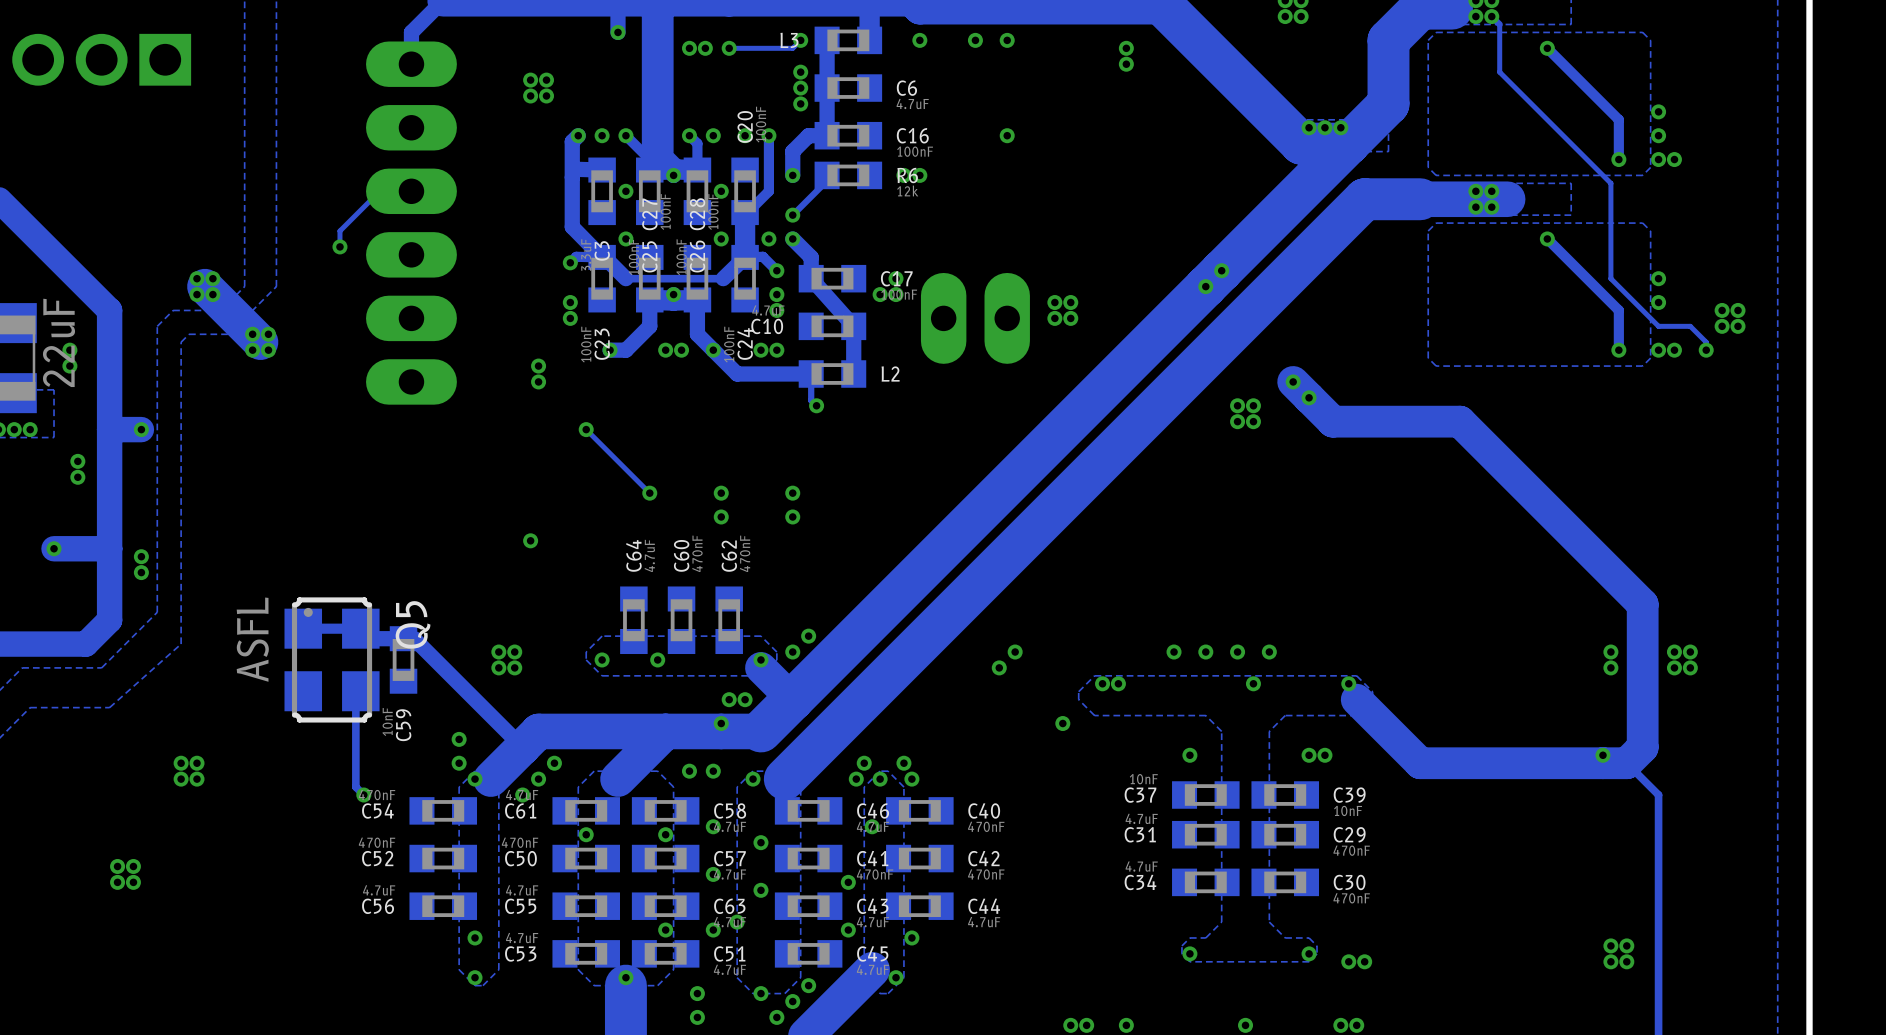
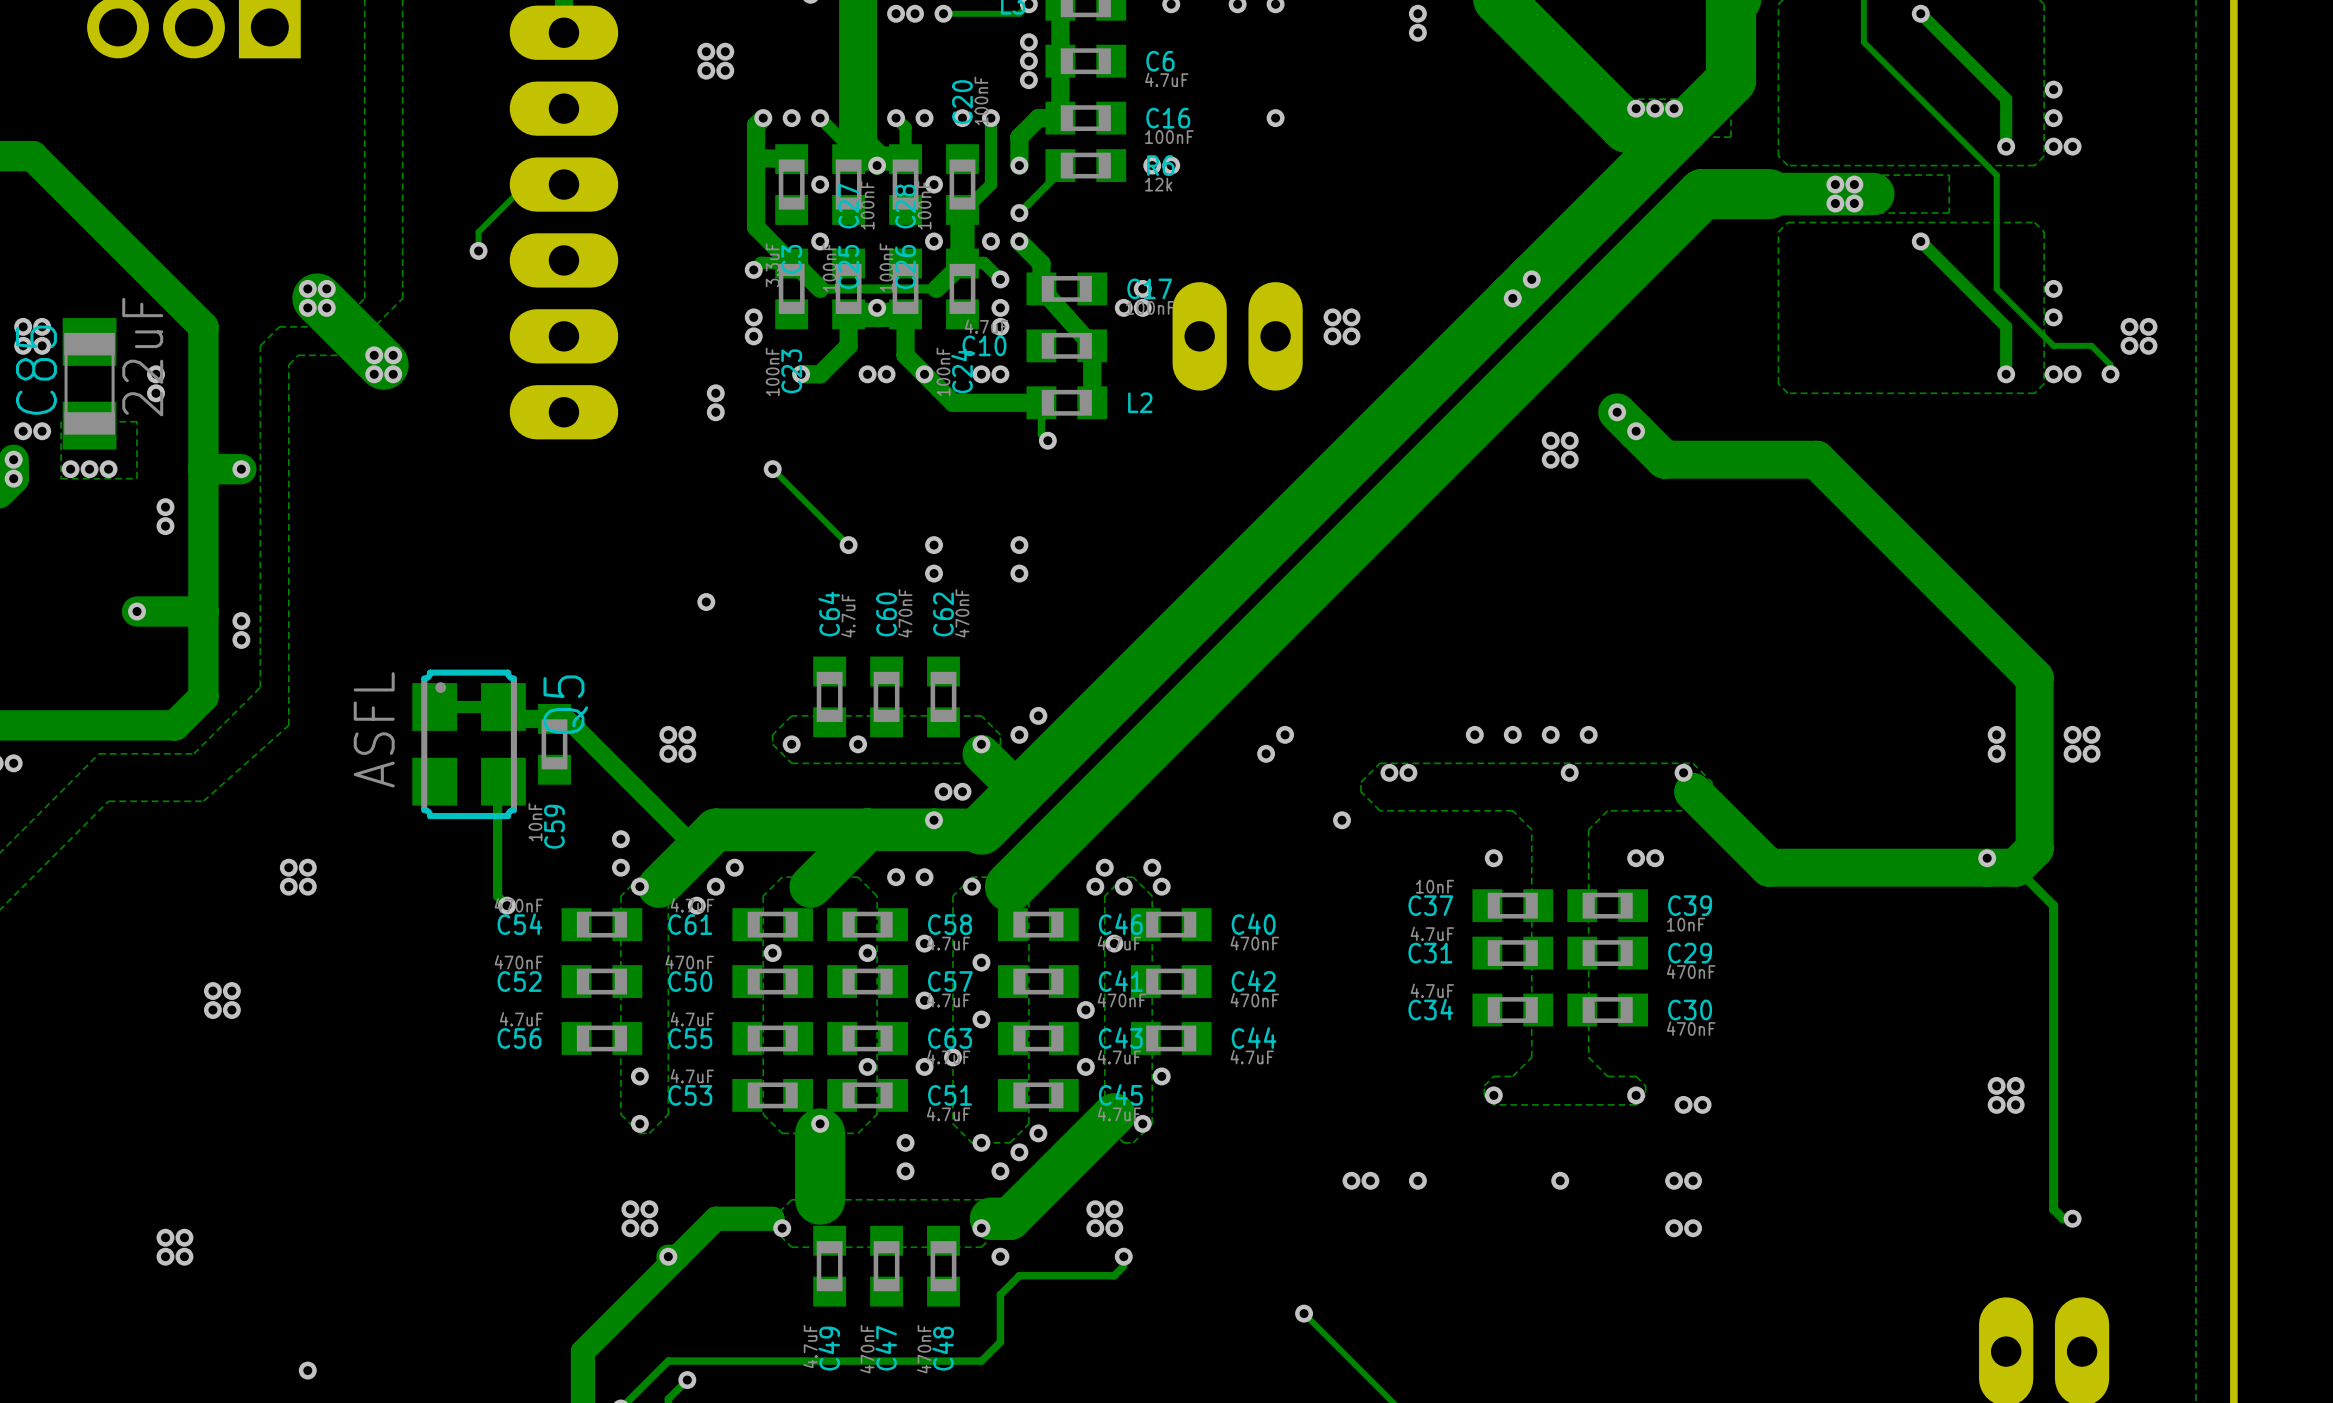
track width: thin (204, 286) (260, 342) -> thick (317, 298) (383, 364)

